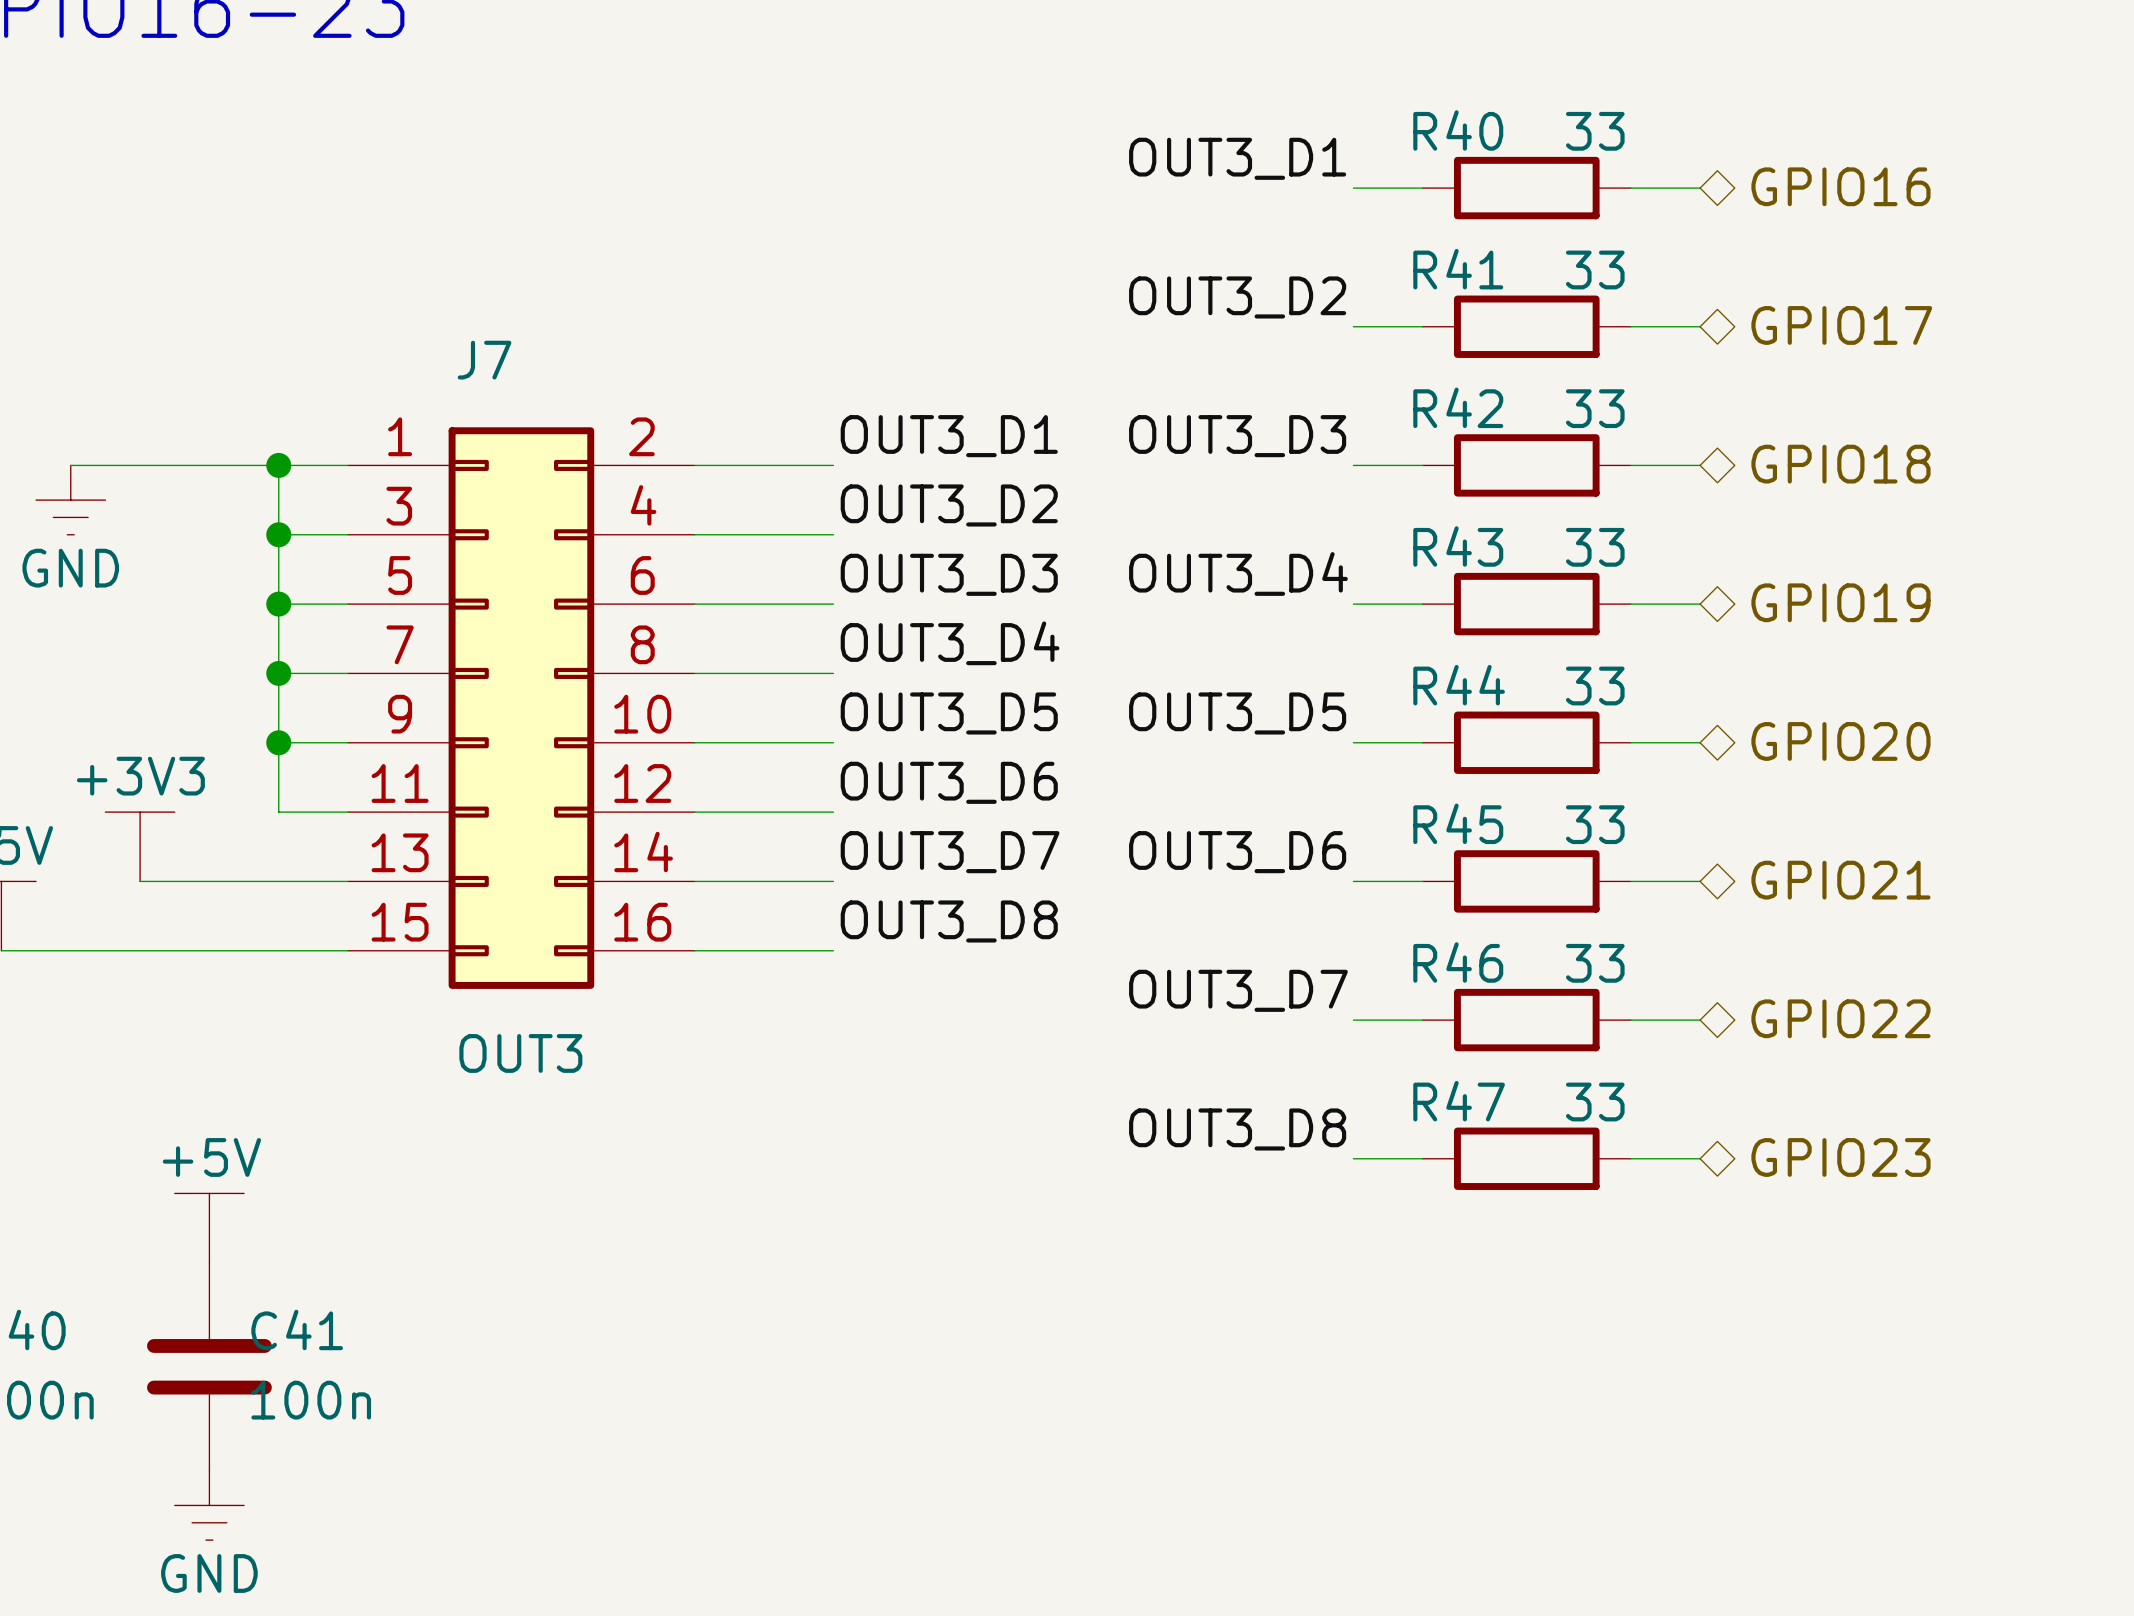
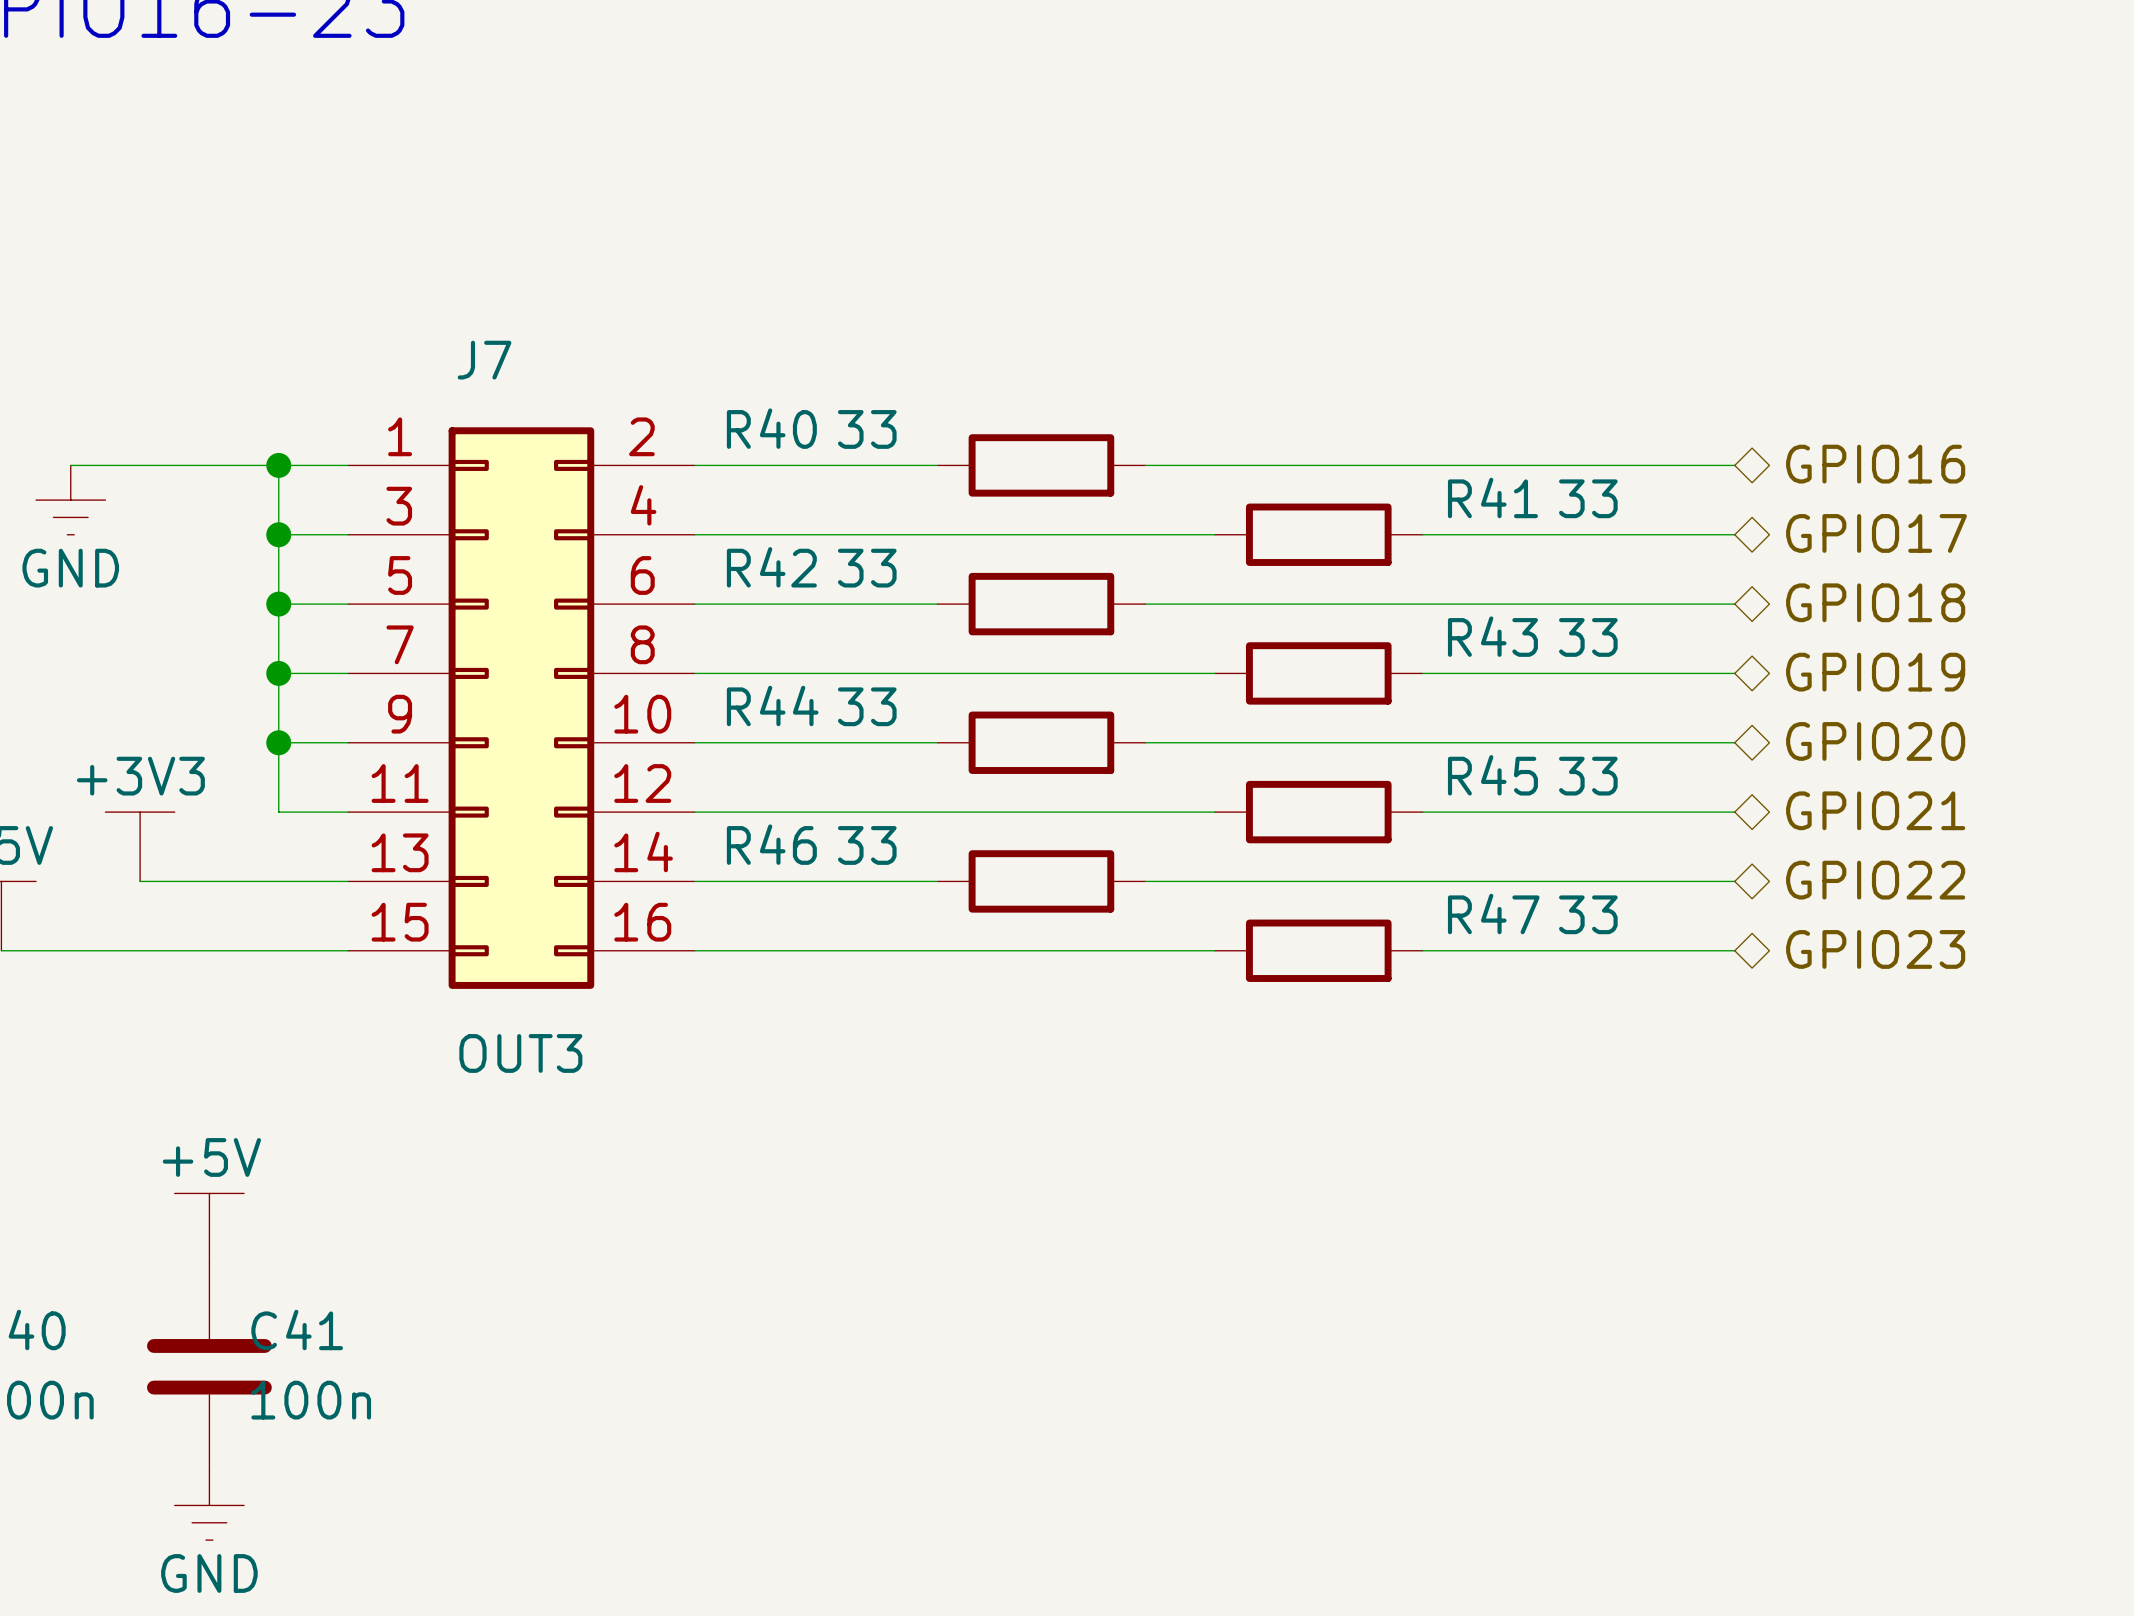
R40 name position: R40 (1458, 130) -> R40 (771, 428)
R40 value position: 33 (1595, 131) -> 33 (867, 429)
label: OUT3_D1 (1237, 158) -> none
hierarchical label position: GPIO16 (1840, 186) -> GPIO16 (1875, 464)
wire: (1353, 188) (1422, 188) -> none
R40 position: (1526, 188) -> (1041, 465)
wire: (1630, 188) (1700, 188) -> none
R41 name position: R41 (1458, 269) -> R41 (1492, 497)
R41 value position: 33 (1595, 269) -> 33 (1588, 498)
label: OUT3_D2 (1237, 297) -> none
hierarchical label position: GPIO17 (1841, 325) -> GPIO17 (1876, 533)
wire: (1353, 326) (1422, 326) -> none
R41 position: (1526, 326) -> (1318, 534)
wire: (1630, 326) (1700, 326) -> none
R42 name position: R42 (1458, 407) -> R42 (771, 567)
R42 value position: 33 (1595, 408) -> 33 (867, 568)
label: OUT3_D1 (949, 436) -> none
label: OUT3_D3 (1237, 436) -> none
hierarchical label position: GPIO18 (1840, 464) -> GPIO18 (1875, 602)
wire: none -> (833, 465) (937, 465)
wire: none -> (1145, 465) (1353, 465)
wire: none -> (1422, 465) (1630, 465)
R42 position: (1526, 465) -> (1041, 604)
wire: none -> (1700, 465) (1734, 465)
label: OUT3_D2 (949, 505) -> none
wire: none -> (833, 534) (1214, 534)
wire: none -> (1422, 534) (1734, 534)
R43 name position: R43 (1458, 546) -> R43 (1492, 636)
R43 value position: 33 (1595, 547) -> 33 (1588, 637)
label: OUT3_D4 (1238, 573) -> none
label: OUT3_D3 (949, 574) -> none
hierarchical label position: GPIO19 (1840, 602) -> GPIO19 (1875, 672)
wire: none -> (833, 604) (937, 604)
wire: none -> (1145, 604) (1353, 604)
wire: none -> (1422, 604) (1630, 604)
R43 position: (1526, 604) -> (1318, 673)
wire: none -> (1700, 604) (1734, 604)
label: OUT3_D4 (950, 643) -> none
wire: none -> (833, 673) (1214, 673)
wire: none -> (1422, 673) (1734, 673)
R44 name position: R44 (1459, 685) -> R44 (772, 705)
R44 value position: 33 (1595, 685) -> 33 (867, 706)
label: OUT3_D5 (949, 713) -> none
label: OUT3_D5 (1237, 713) -> none
hierarchical label position: GPIO20 (1840, 741) -> GPIO20 (1875, 741)
wire: none -> (833, 742) (937, 742)
wire: none -> (1145, 742) (1353, 742)
wire: none -> (1422, 742) (1630, 742)
R44 position: (1526, 742) -> (1041, 742)
wire: none -> (1700, 742) (1734, 742)
label: OUT3_D6 (949, 782) -> none
wire: none -> (833, 812) (1214, 812)
wire: none -> (1422, 812) (1734, 812)
R45 name position: R45 (1458, 823) -> R45 (1492, 775)
R45 value position: 33 (1595, 824) -> 33 (1588, 776)
label: OUT3_D7 (950, 852) -> none
label: OUT3_D6 (1237, 852) -> none
hierarchical label position: GPIO21 (1840, 880) -> GPIO21 (1875, 810)
wire: none -> (833, 881) (937, 881)
wire: none -> (1145, 881) (1353, 881)
wire: none -> (1422, 881) (1630, 881)
R45 position: (1526, 881) -> (1318, 812)
wire: none -> (1700, 881) (1734, 881)
label: OUT3_D8 (949, 921) -> none
wire: none -> (833, 950) (1214, 950)
wire: none -> (1422, 950) (1734, 950)
R46 name position: R46 (1458, 962) -> R46 (771, 844)
R46 value position: 33 (1595, 963) -> 33 (867, 845)
label: OUT3_D7 (1238, 990) -> none
hierarchical label position: GPIO22 (1840, 1018) -> GPIO22 (1875, 880)
wire: (1353, 1020) (1422, 1020) -> none
R46 position: (1526, 1020) -> (1041, 881)
wire: (1630, 1020) (1700, 1020) -> none
R47 name position: R47 (1459, 1101) -> R47 (1493, 913)
R47 value position: 33 (1595, 1102) -> 33 (1588, 914)
label: OUT3_D8 (1237, 1129) -> none
hierarchical label position: GPIO23 (1840, 1157) -> GPIO23 (1875, 949)
wire: (1353, 1158) (1422, 1158) -> none
R47 position: (1526, 1158) -> (1318, 950)
wire: (1630, 1158) (1700, 1158) -> none

